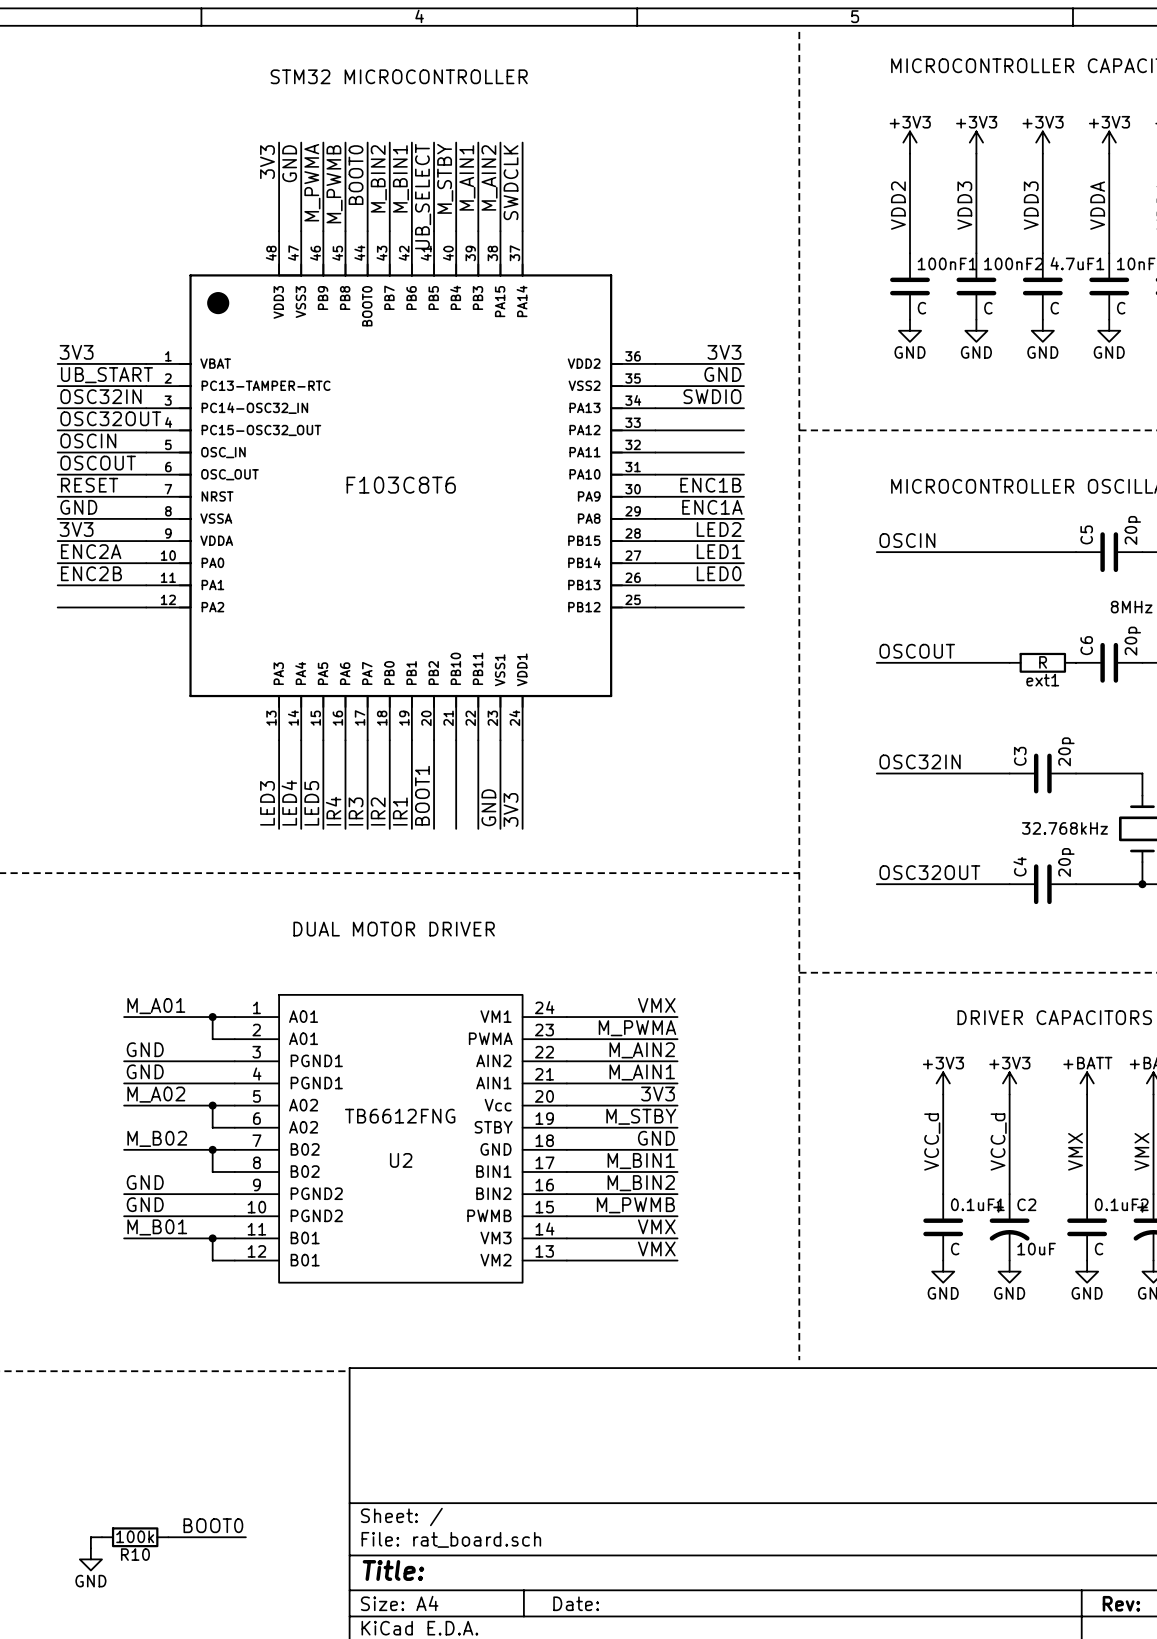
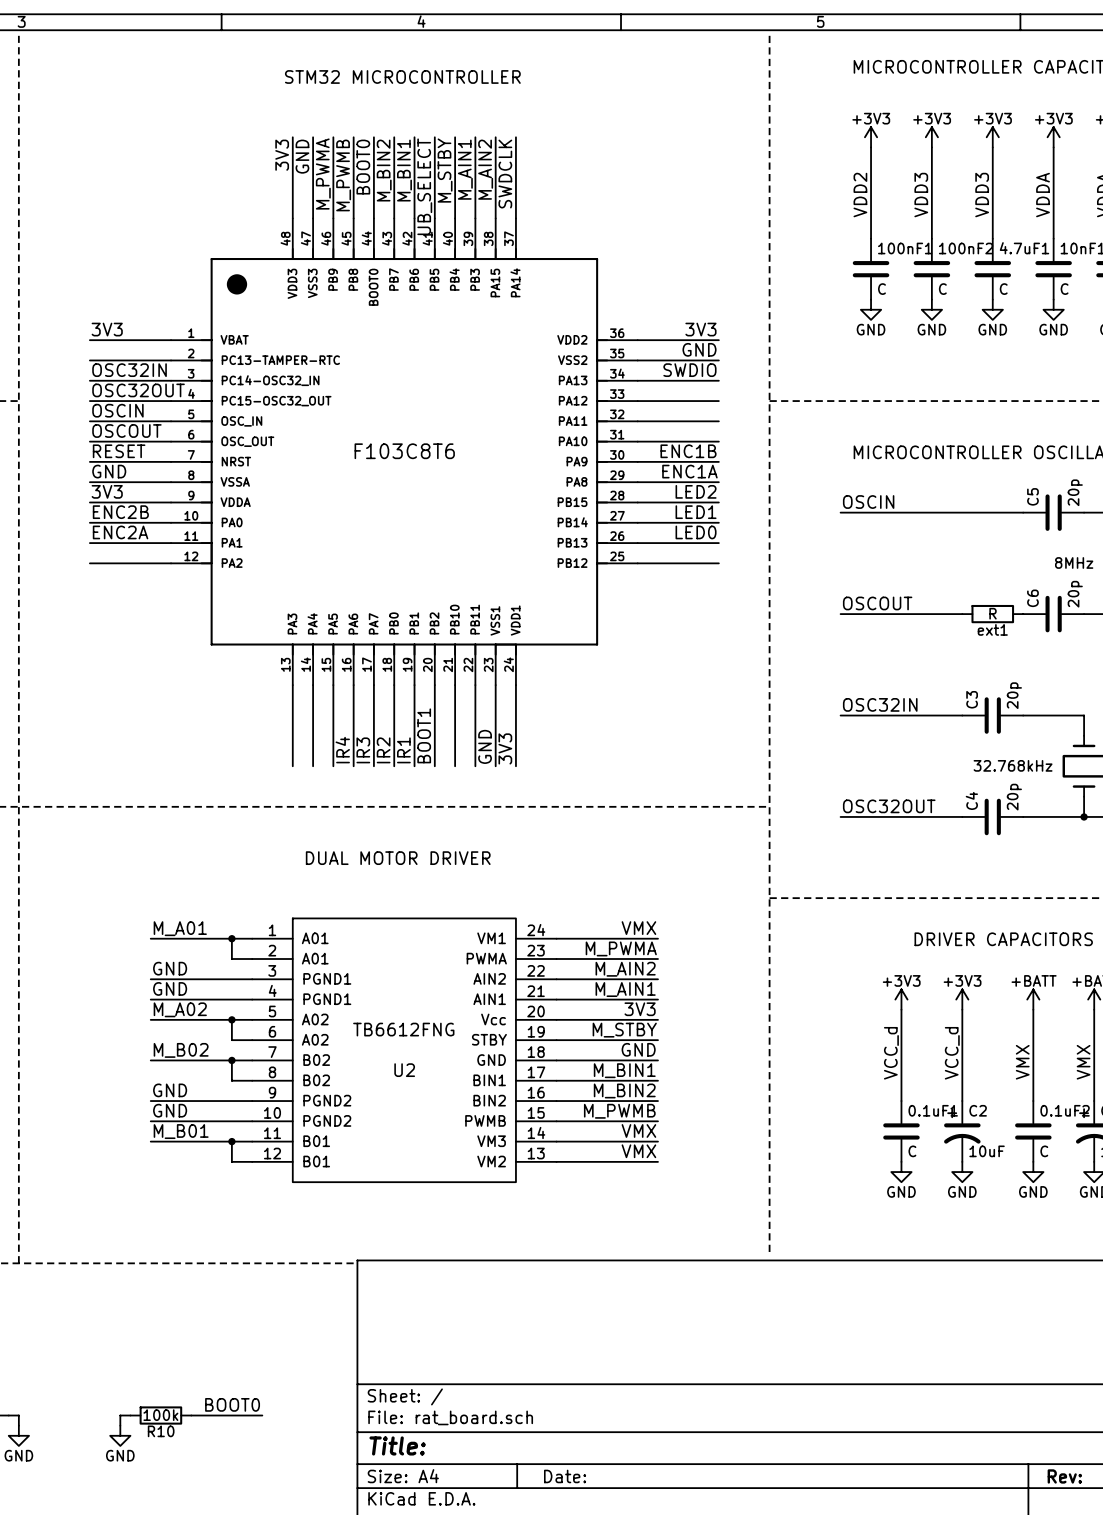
label: UB_START (106, 375) -> none
label: ENC2A (91, 551) -> ENC2B (120, 512)
label: ENC2B (91, 573) -> ENC2A (120, 532)
label: LED3 (267, 803) -> none
label: LED4 (289, 803) -> none
label: LED5 (311, 803) -> none

